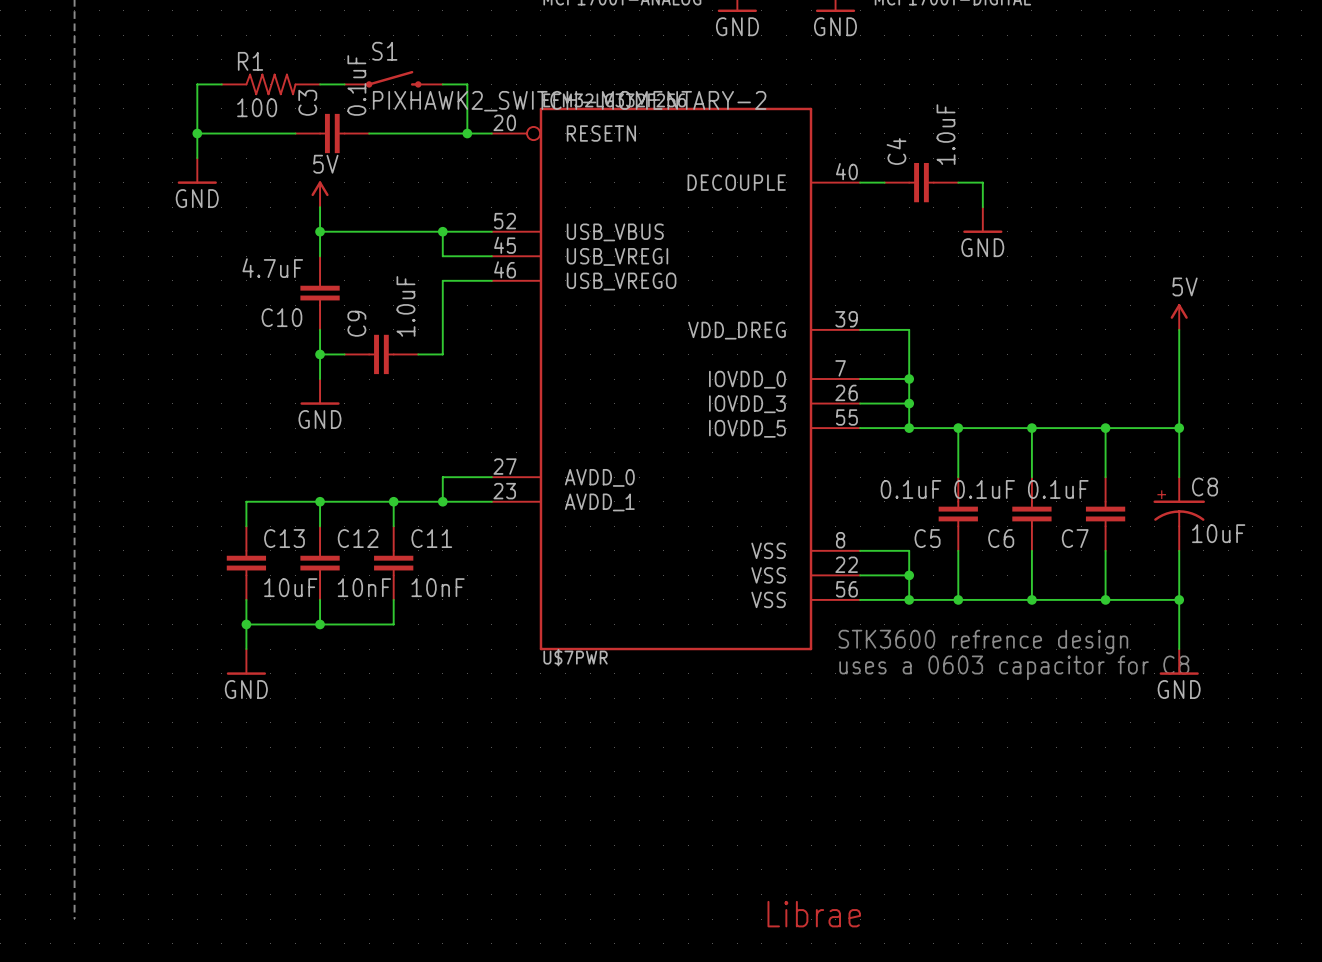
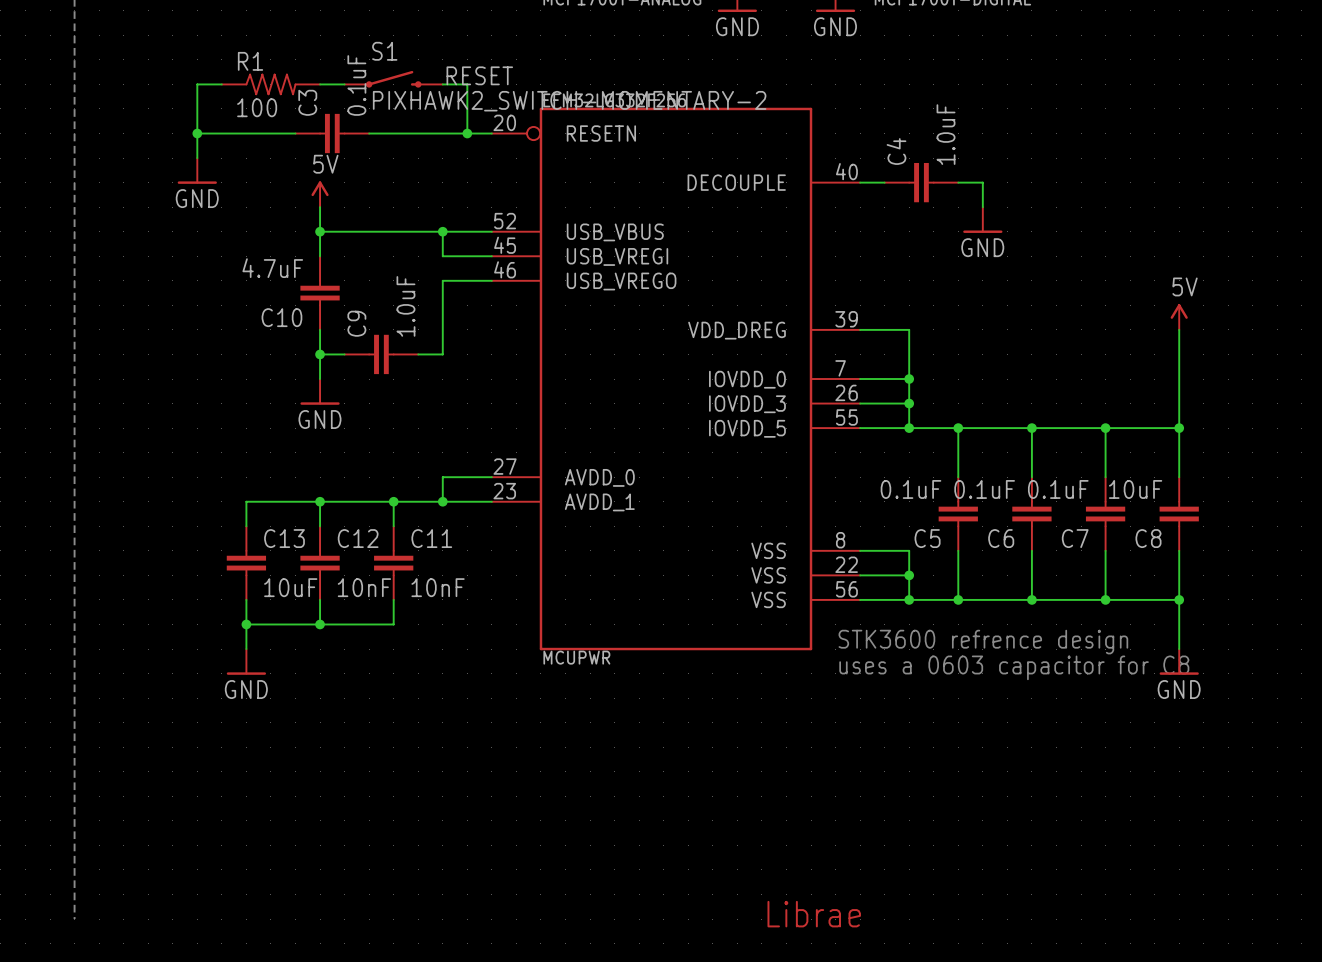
label: none -> RESET (479, 75)
C8 symbol: [1153, 477, 1205, 551] -> [1159, 477, 1199, 551]
C8 name position: C8 (1205, 487) -> C8 (1148, 538)
C8 value position: 10uF (1218, 533) -> 10uF (1135, 489)
U$7PWR name: U$7PWR (575, 657) -> MCUPWR (576, 657)

